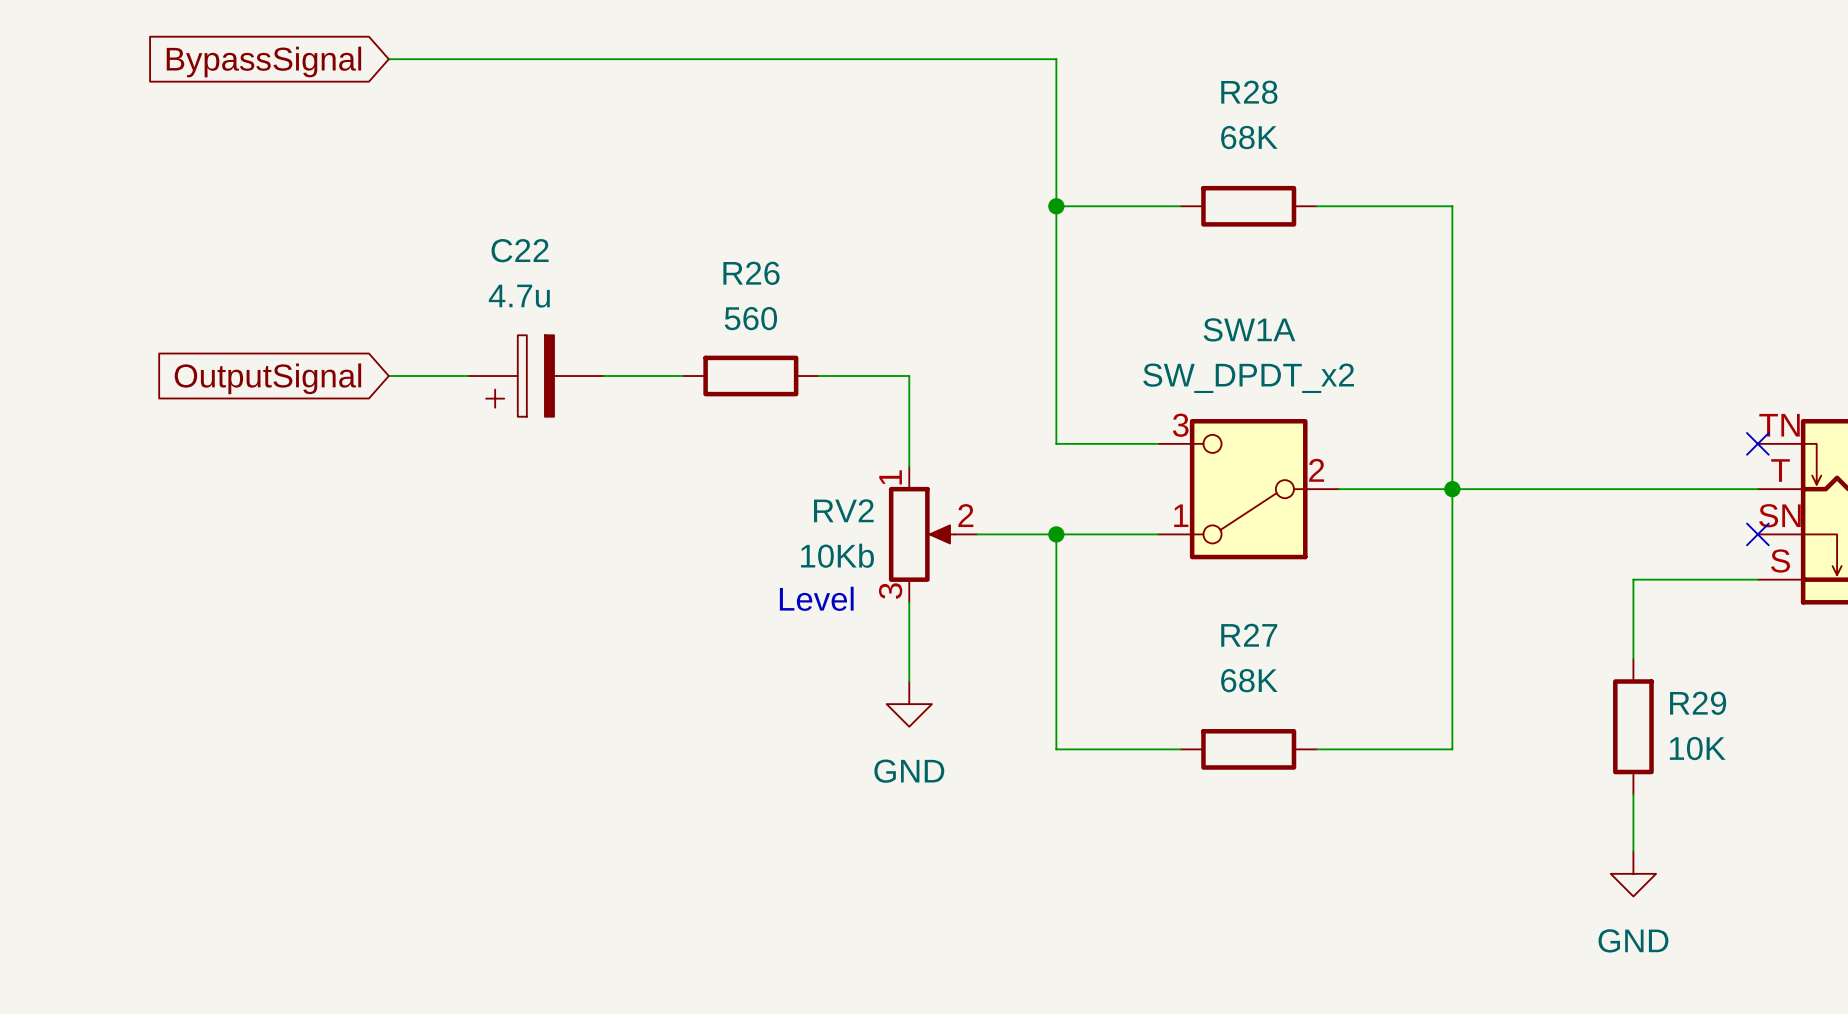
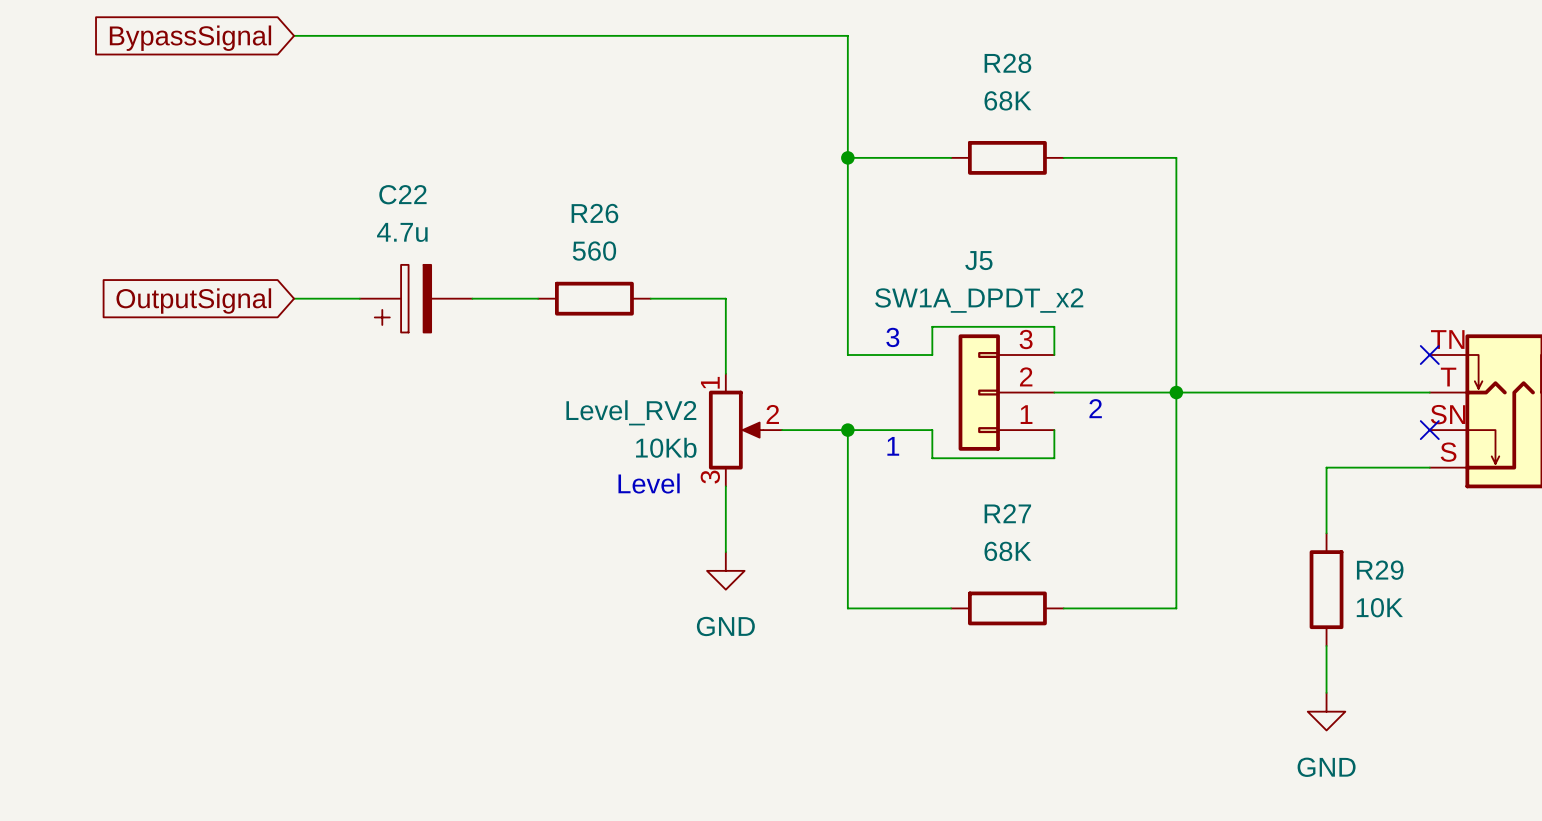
text: none -> 3 (892, 337)
wire: none -> (932, 355) (932, 326) (1054, 326) (1054, 355)
J5: none -> SW1A_DPDT_x2 (1006, 392)
SW1A: SW_DPDT_x2 (1248, 489) -> none
text: none -> 2 (1095, 408)
RV2 name: RV2 (843, 510) -> Level_RV2 (631, 412)
wire: none -> (932, 430) (932, 458) (1054, 458) (1054, 430)
text: none -> 1 (893, 446)

